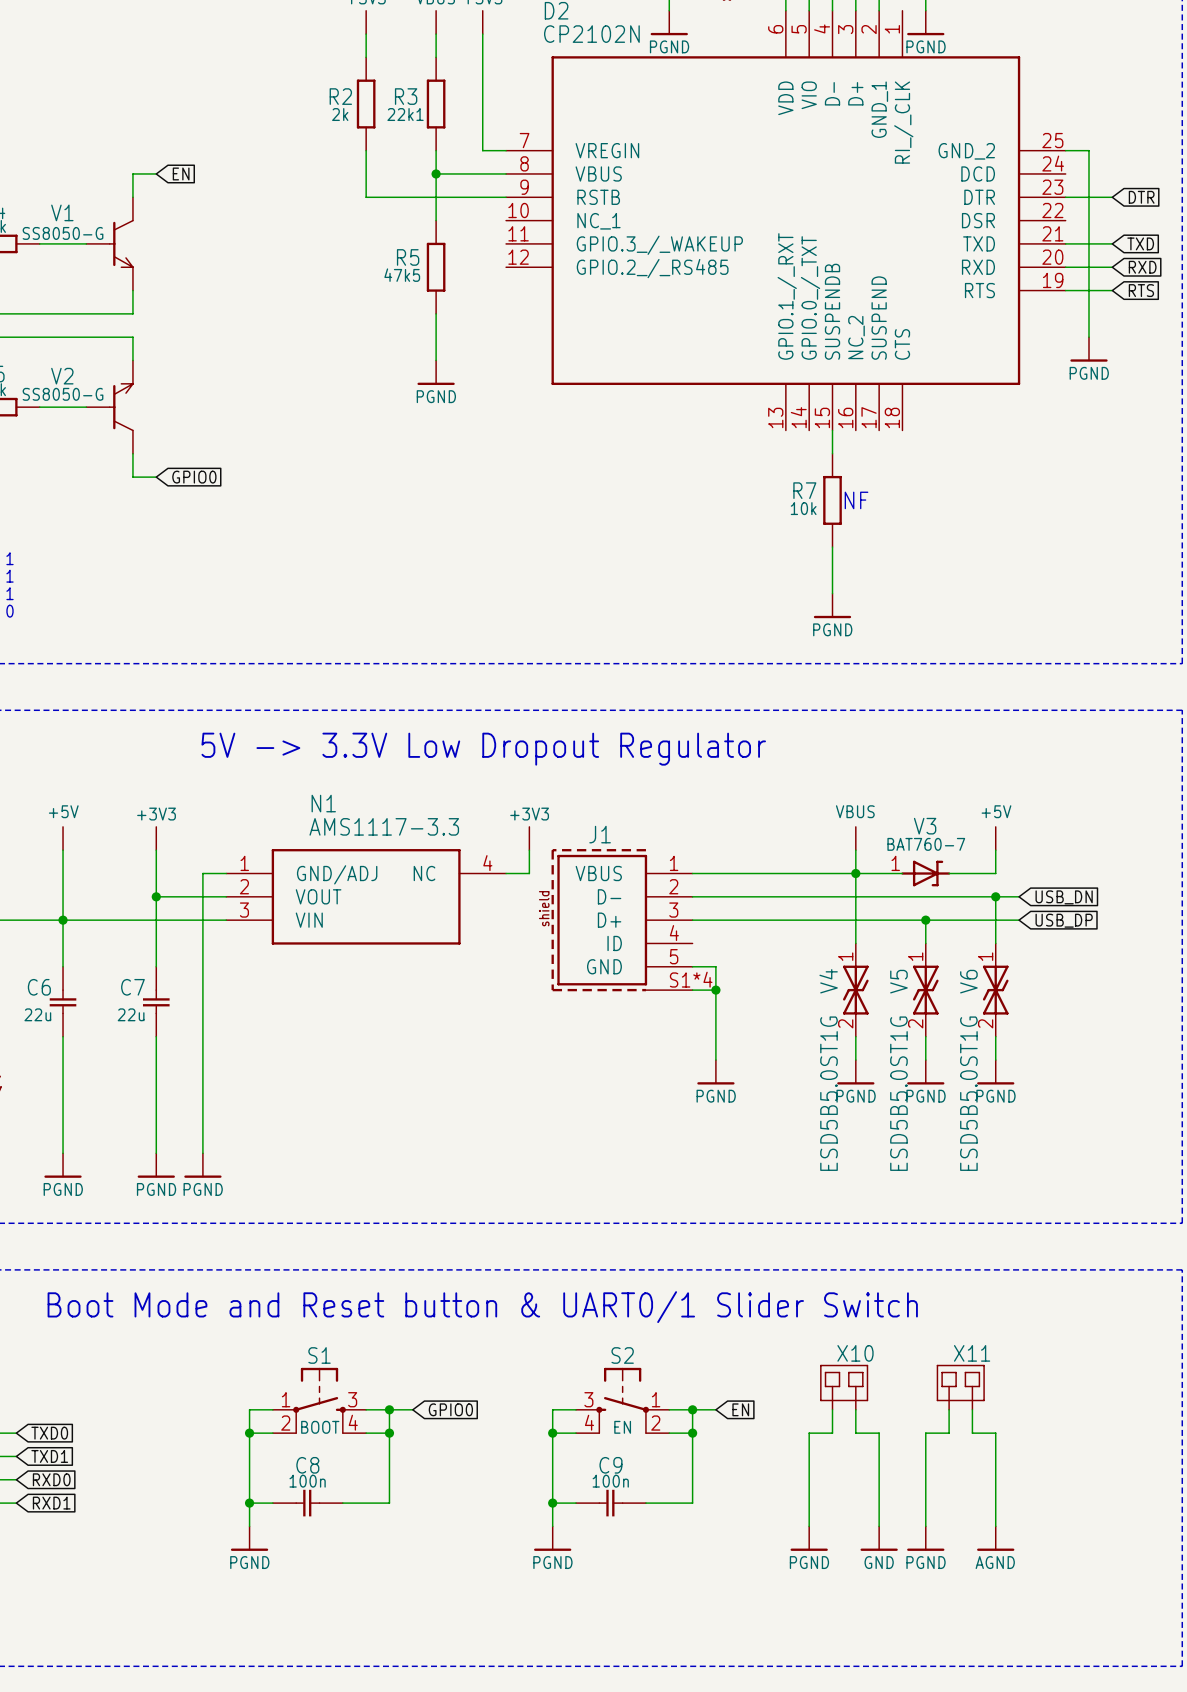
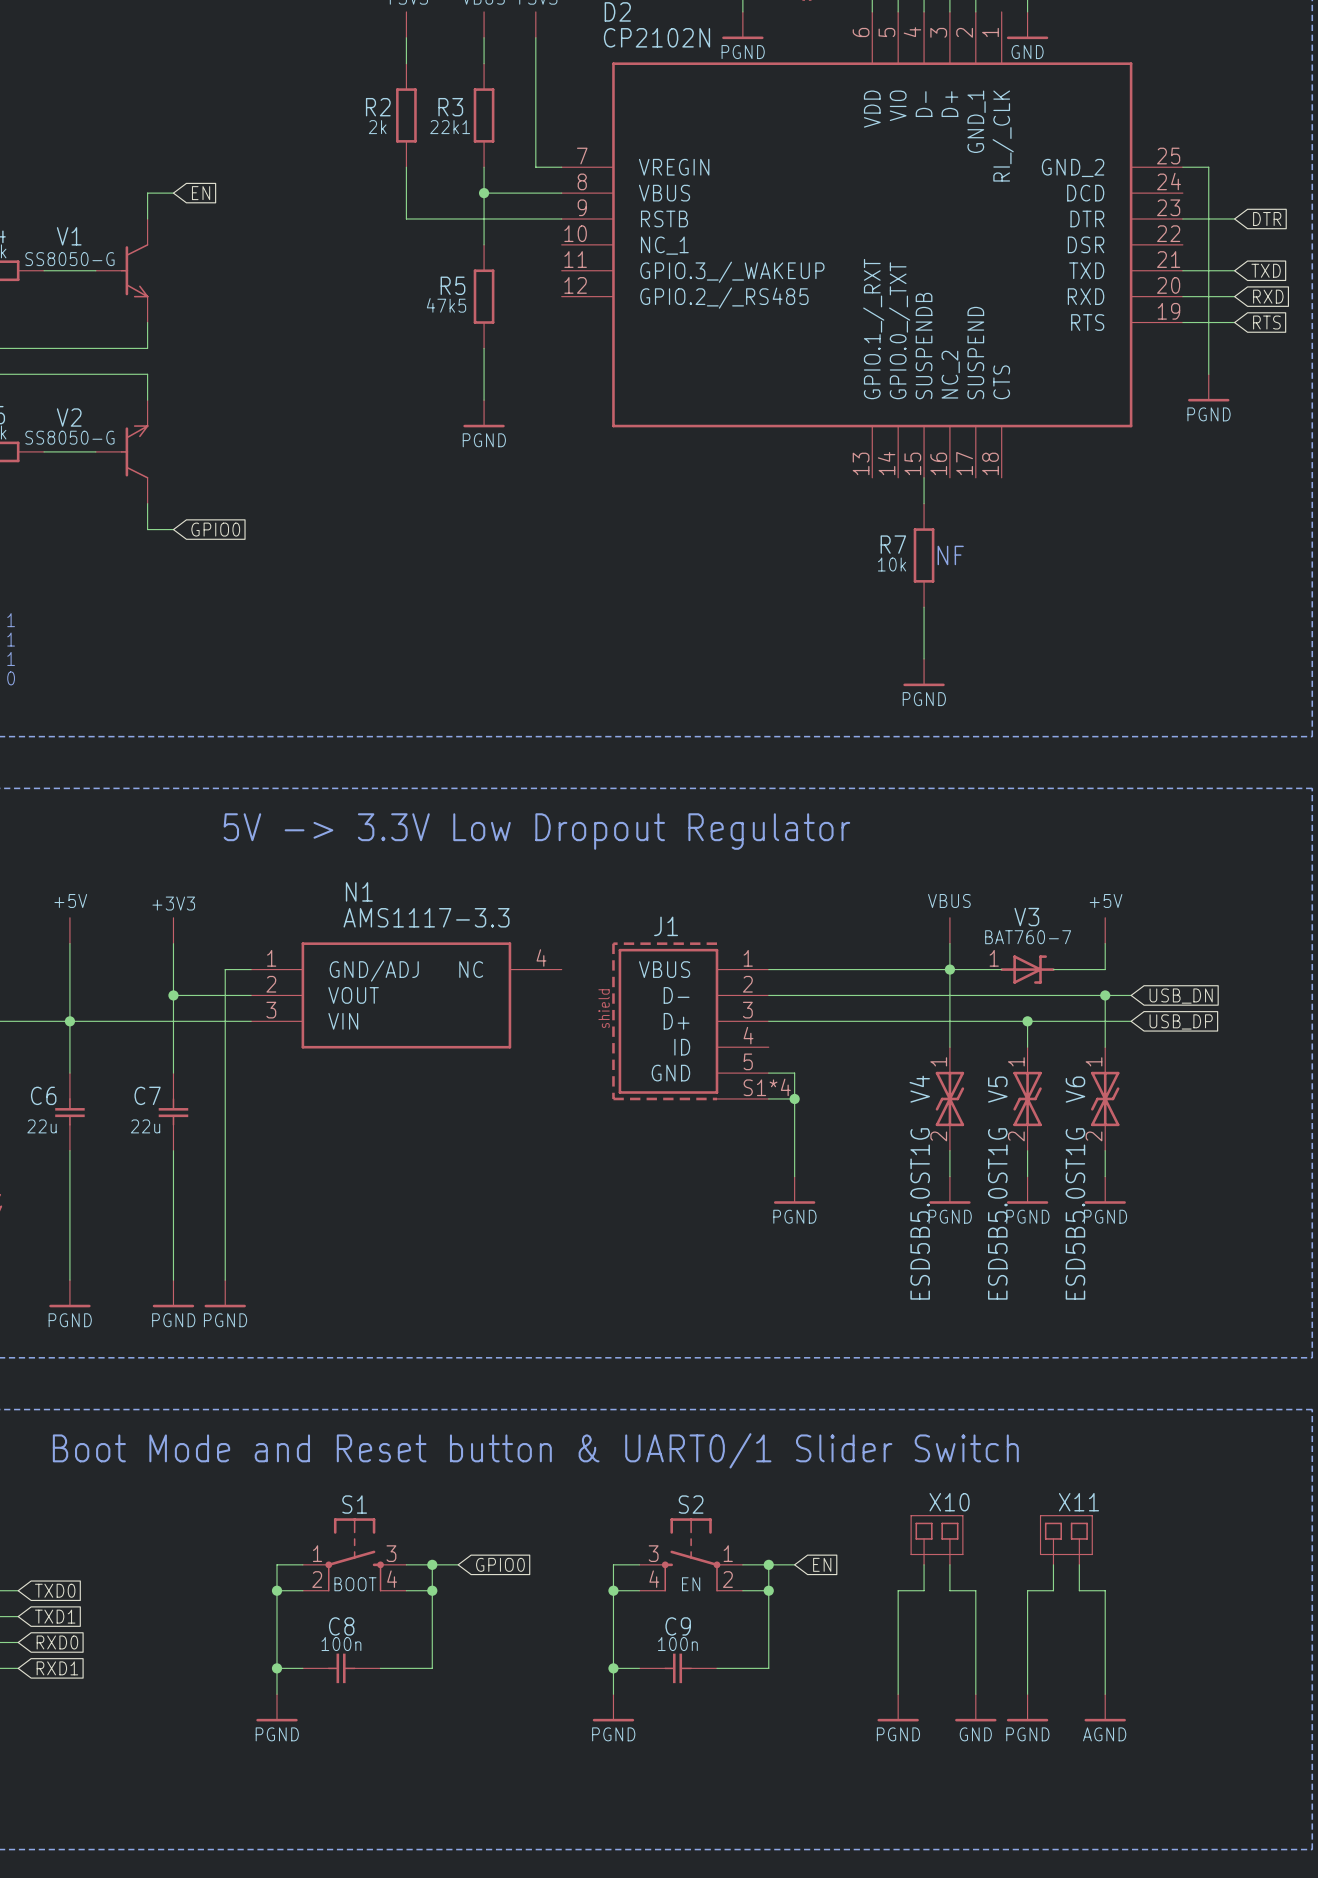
power symbol: PGND (925, 22) -> GND (1027, 25)
power symbol: +3V3 (529, 838) -> none
wire: (529, 850) (529, 873) (506, 873) -> none

